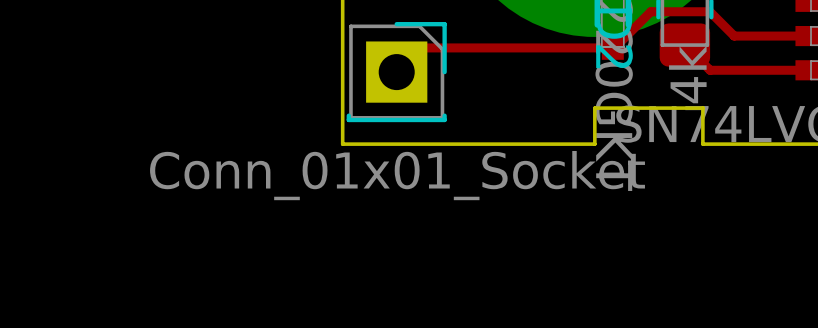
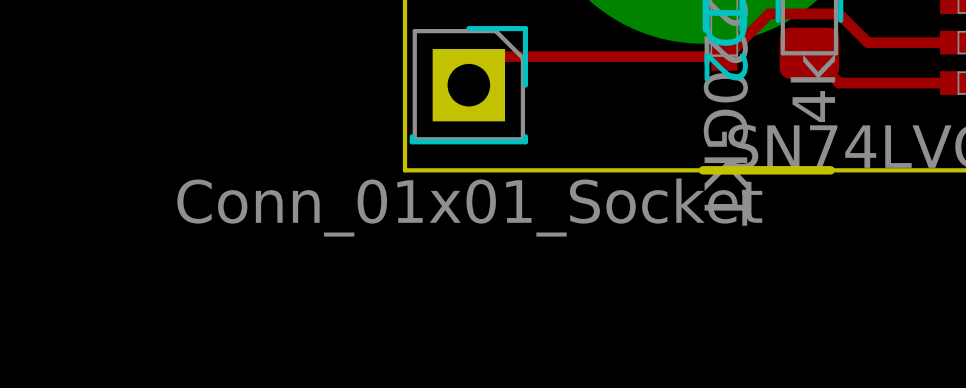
board edge: (594, 144) (594, 108) (702, 108) (702, 144) -> (703, 170) (830, 170)

